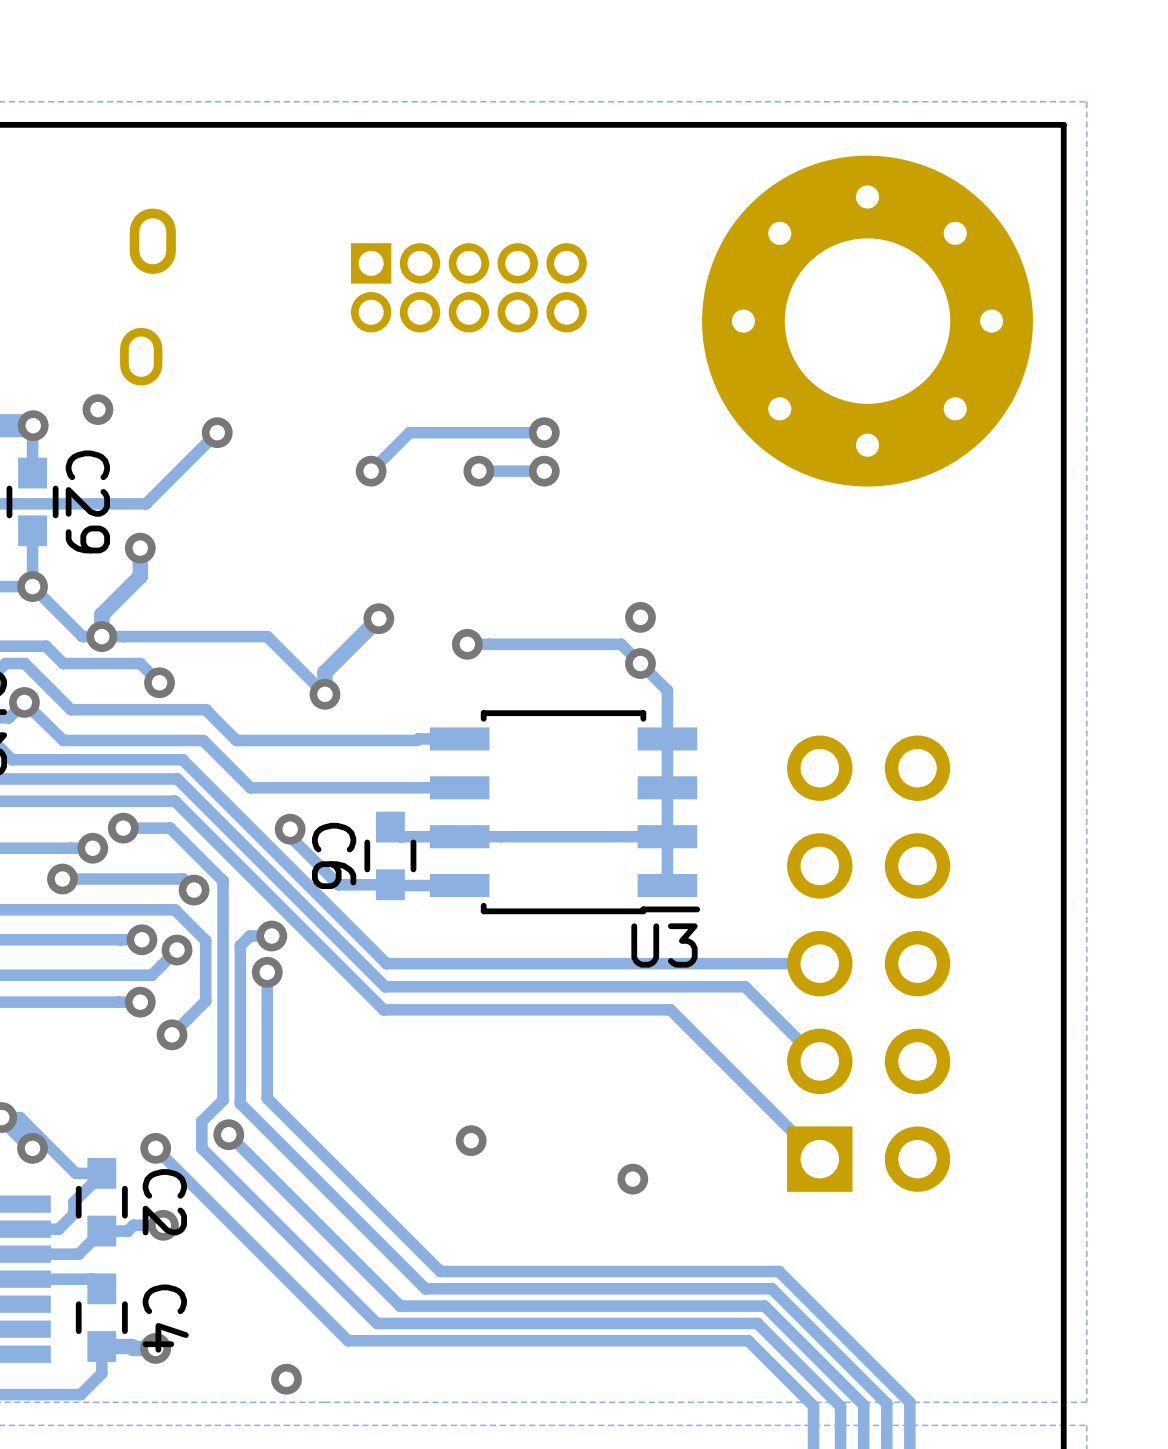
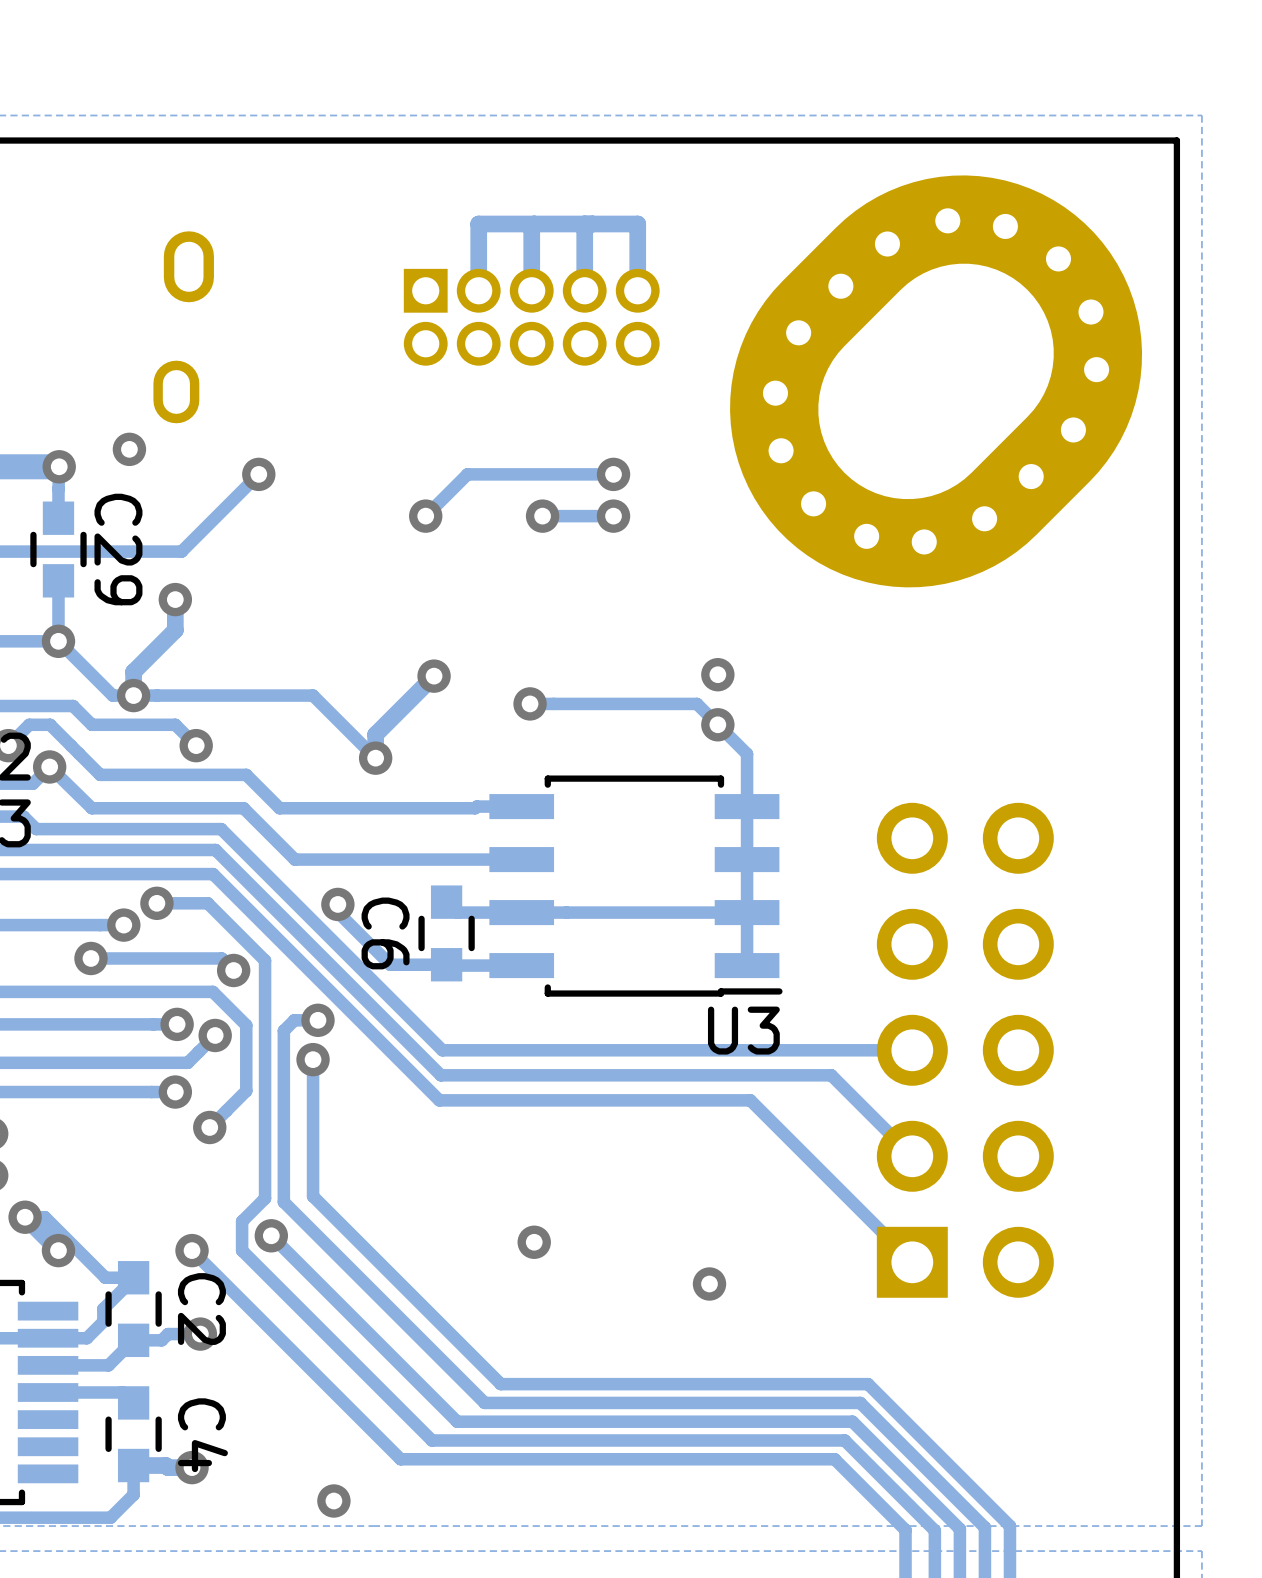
part footprint: [702, 155, 1033, 487] -> [730, 175, 1143, 588]
track: none -> (534, 224) (531, 226) (531, 290)
track: none -> (584, 224) (584, 290)
track: none -> (637, 290) (637, 224) (478, 224) (478, 290)

